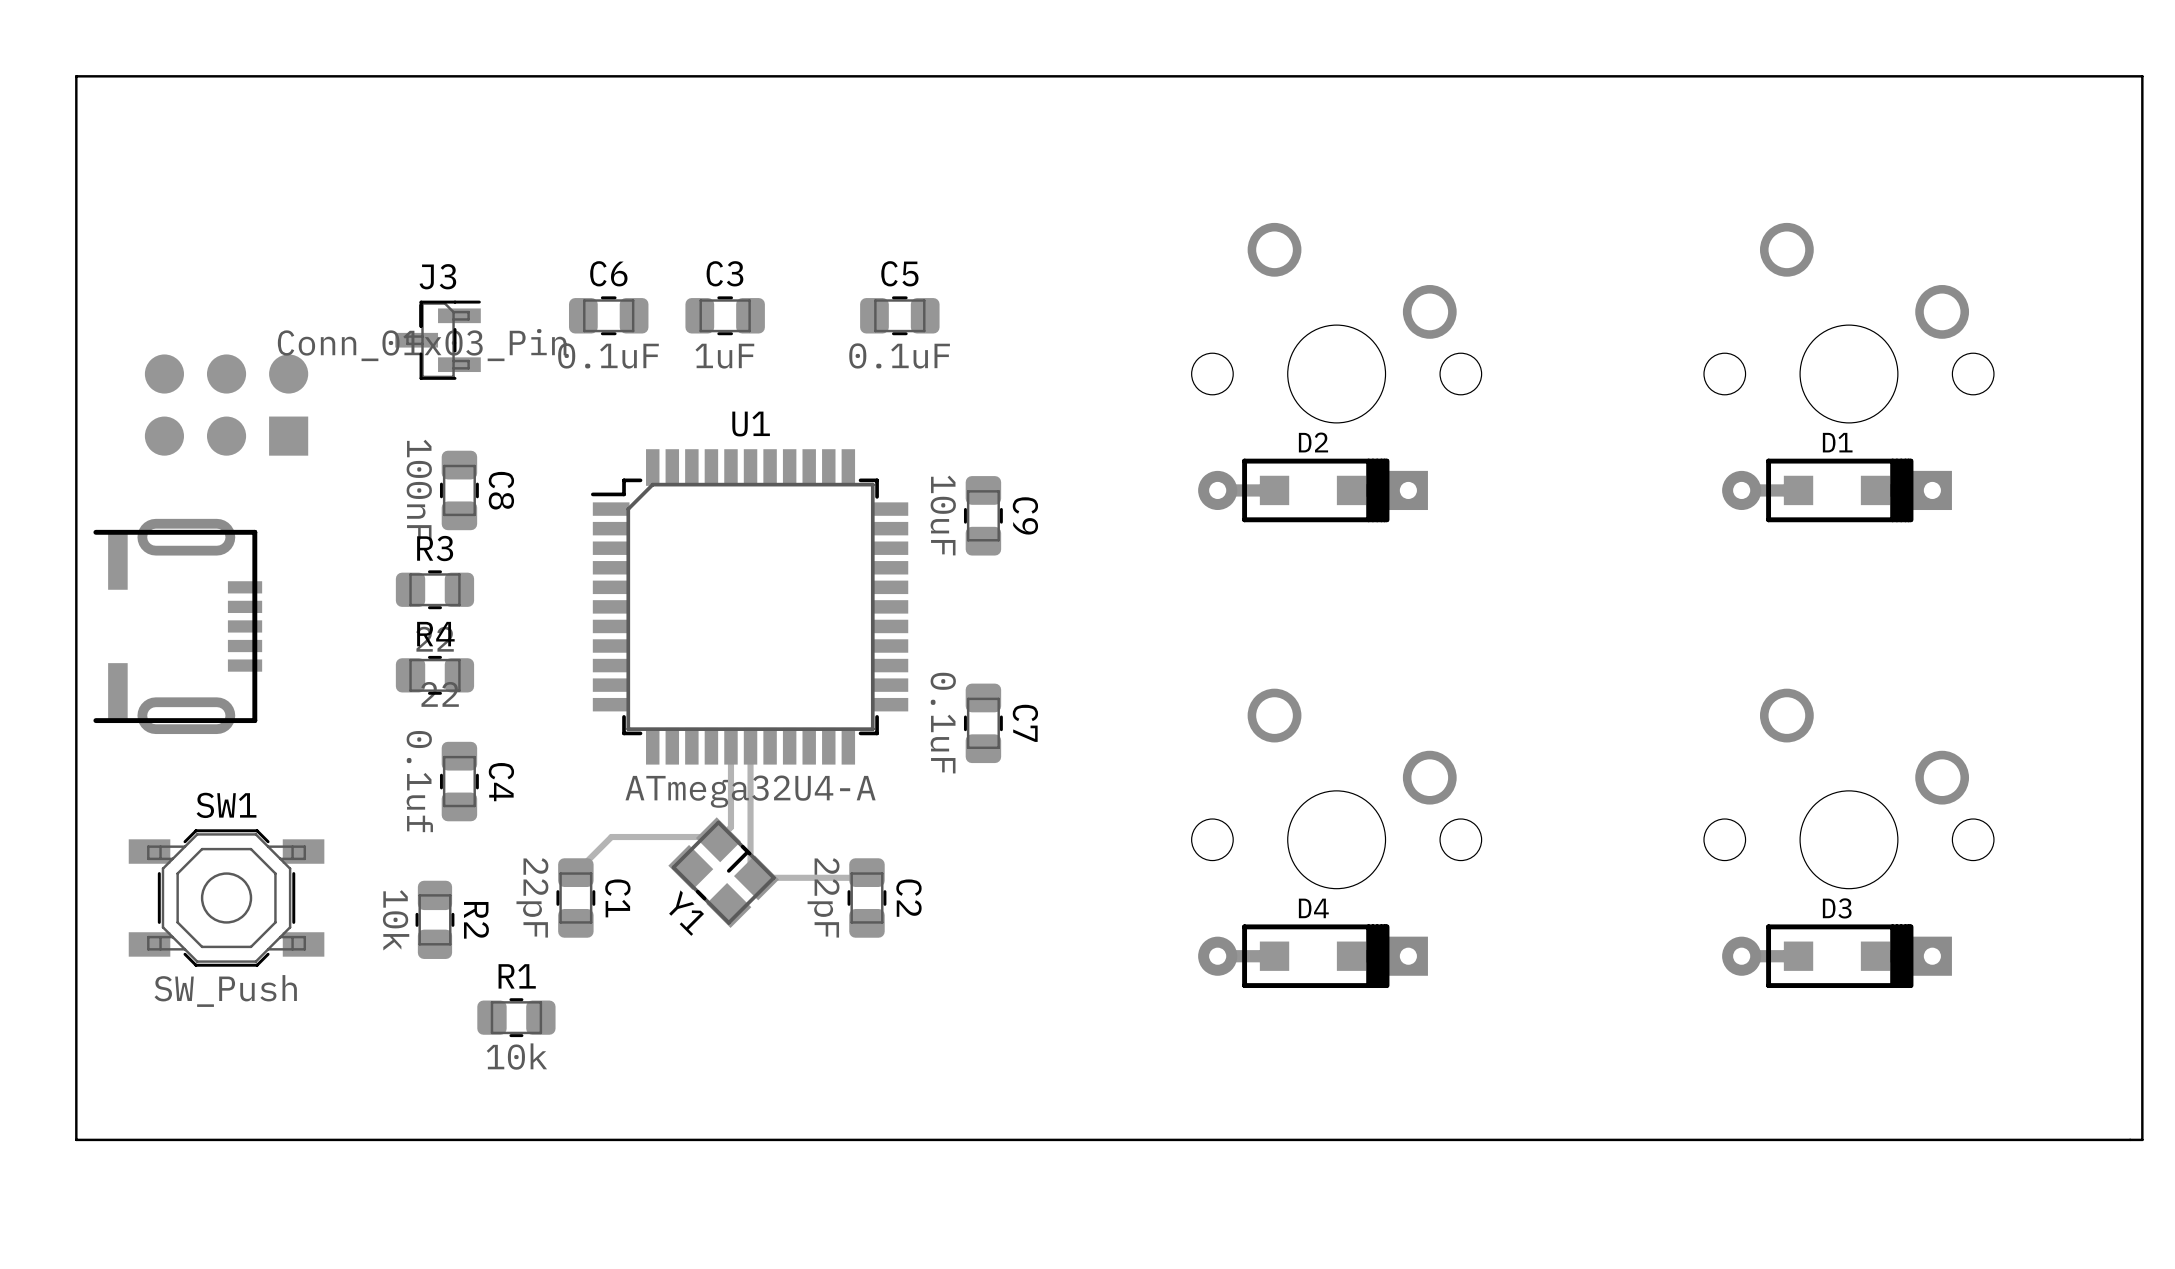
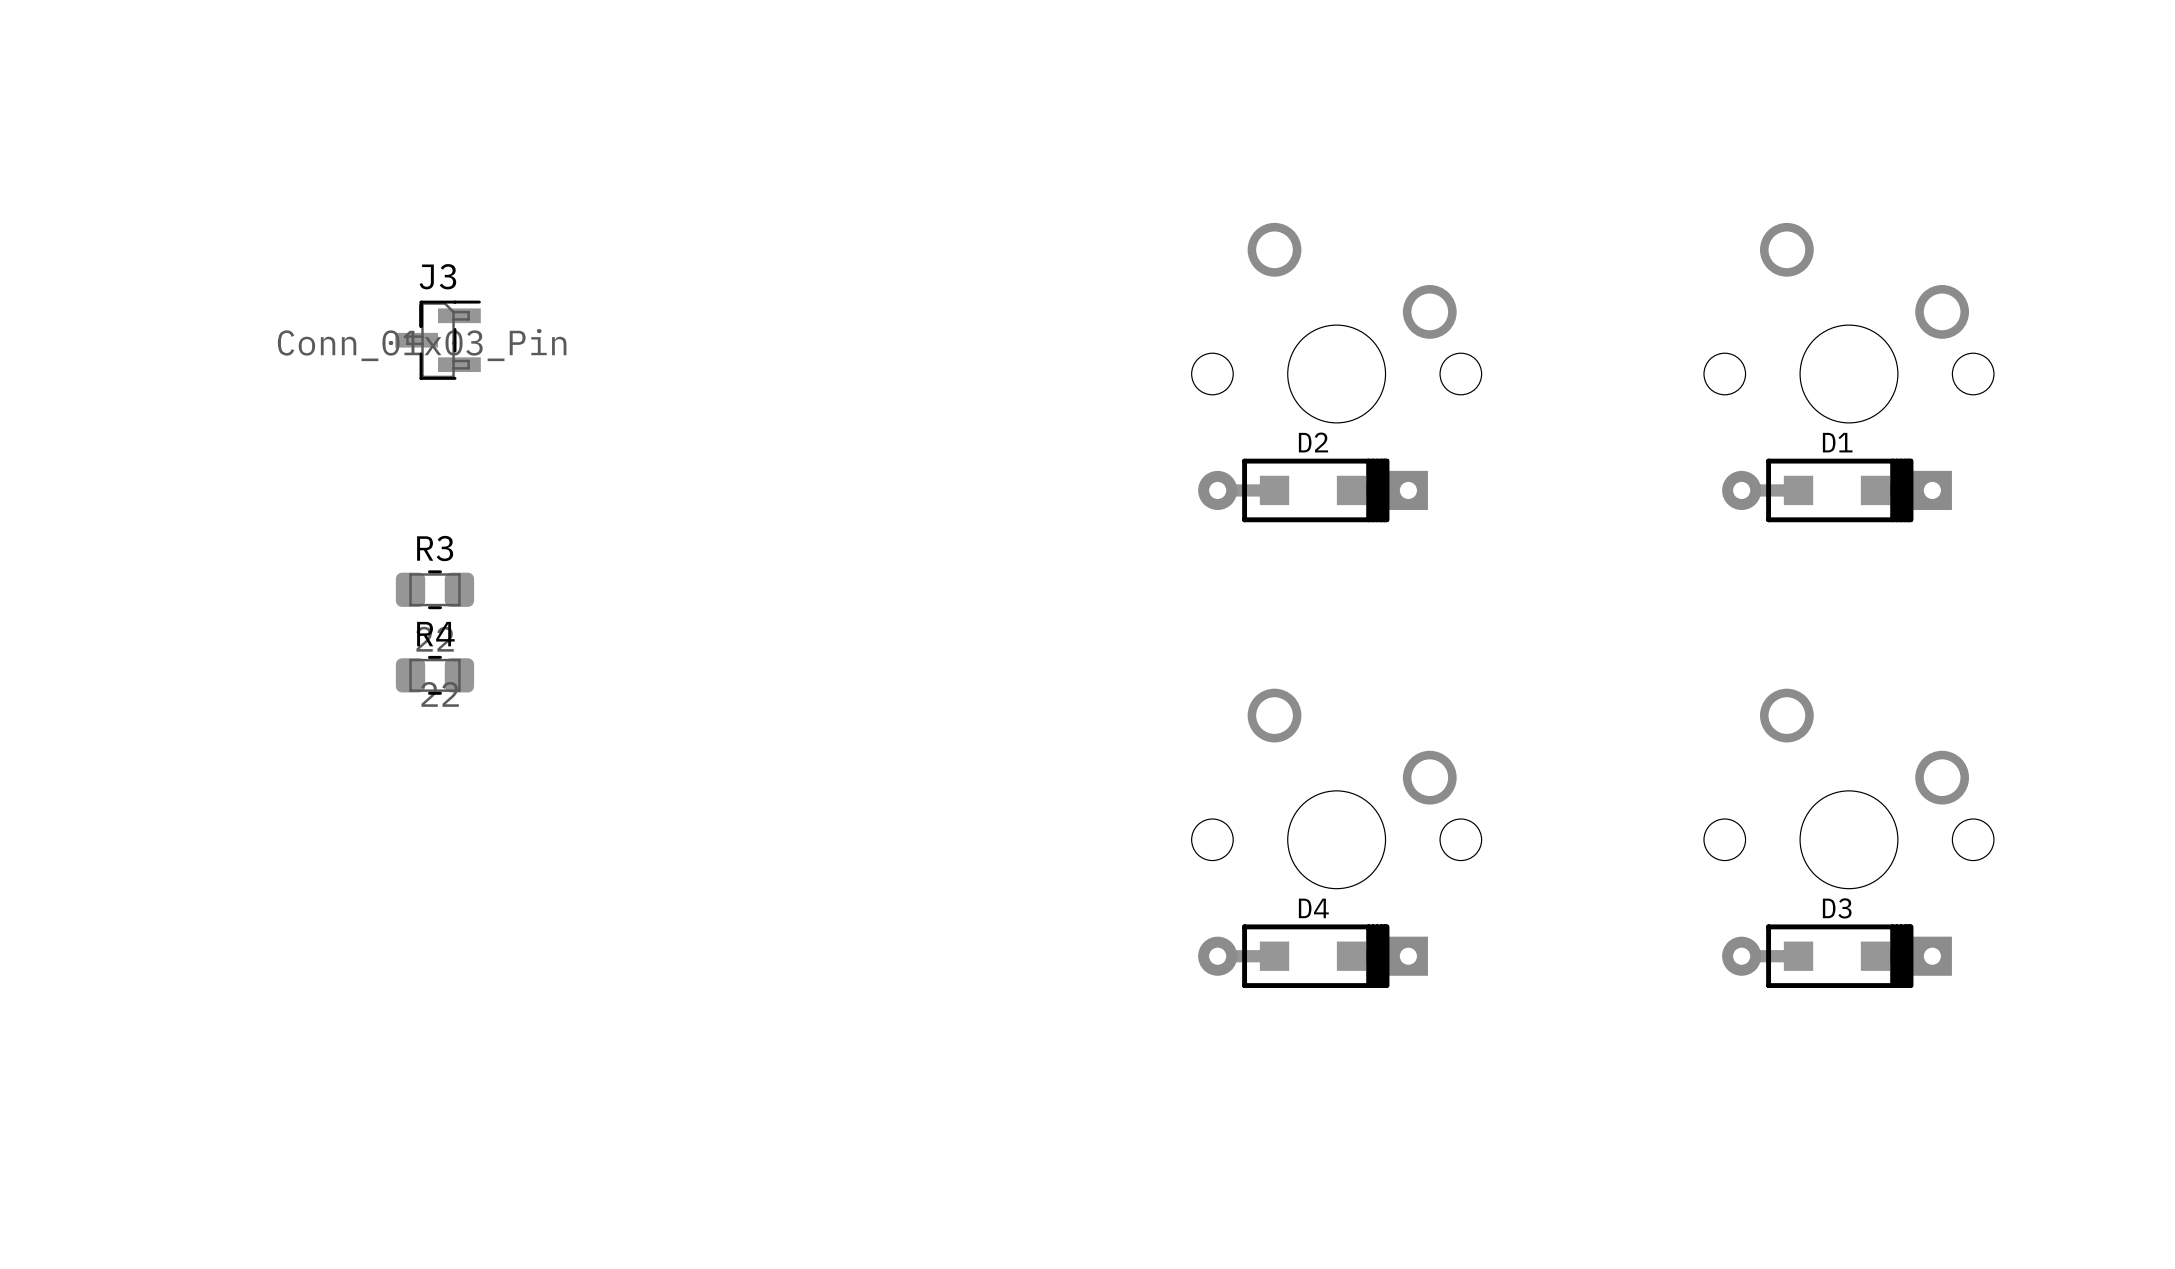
board edge: (2142, 76) (2142, 1139) (76, 1139) (76, 76) (2142, 76) -> none
C6: 0.1uF (608, 315) -> none
C3: 1uF (725, 315) -> none
C5: 0.1uF (899, 315) -> none
part: (226, 405) -> none
C8: 100nF (459, 490) -> none
C9: 10uF (983, 515) -> none
U1: ATmega32U4-A (749, 606) -> none
part: (177, 626) -> none
C7: 0.1uF (983, 723) -> none
track: (730, 746) (730, 827) (718, 839) (715, 837) (611, 837) (575, 872) -> none
track: (750, 746) (750, 871) (756, 877) (861, 877) (866, 872) -> none
C4: 0.1uf (459, 781) -> none
Y1: (723, 872) -> none
SW1: SW_Push (226, 898) -> none
C1: 22pF (575, 898) -> none
C2: 22pF (866, 898) -> none
R2: 10k (434, 919) -> none
R1: 10k (516, 1017) -> none

